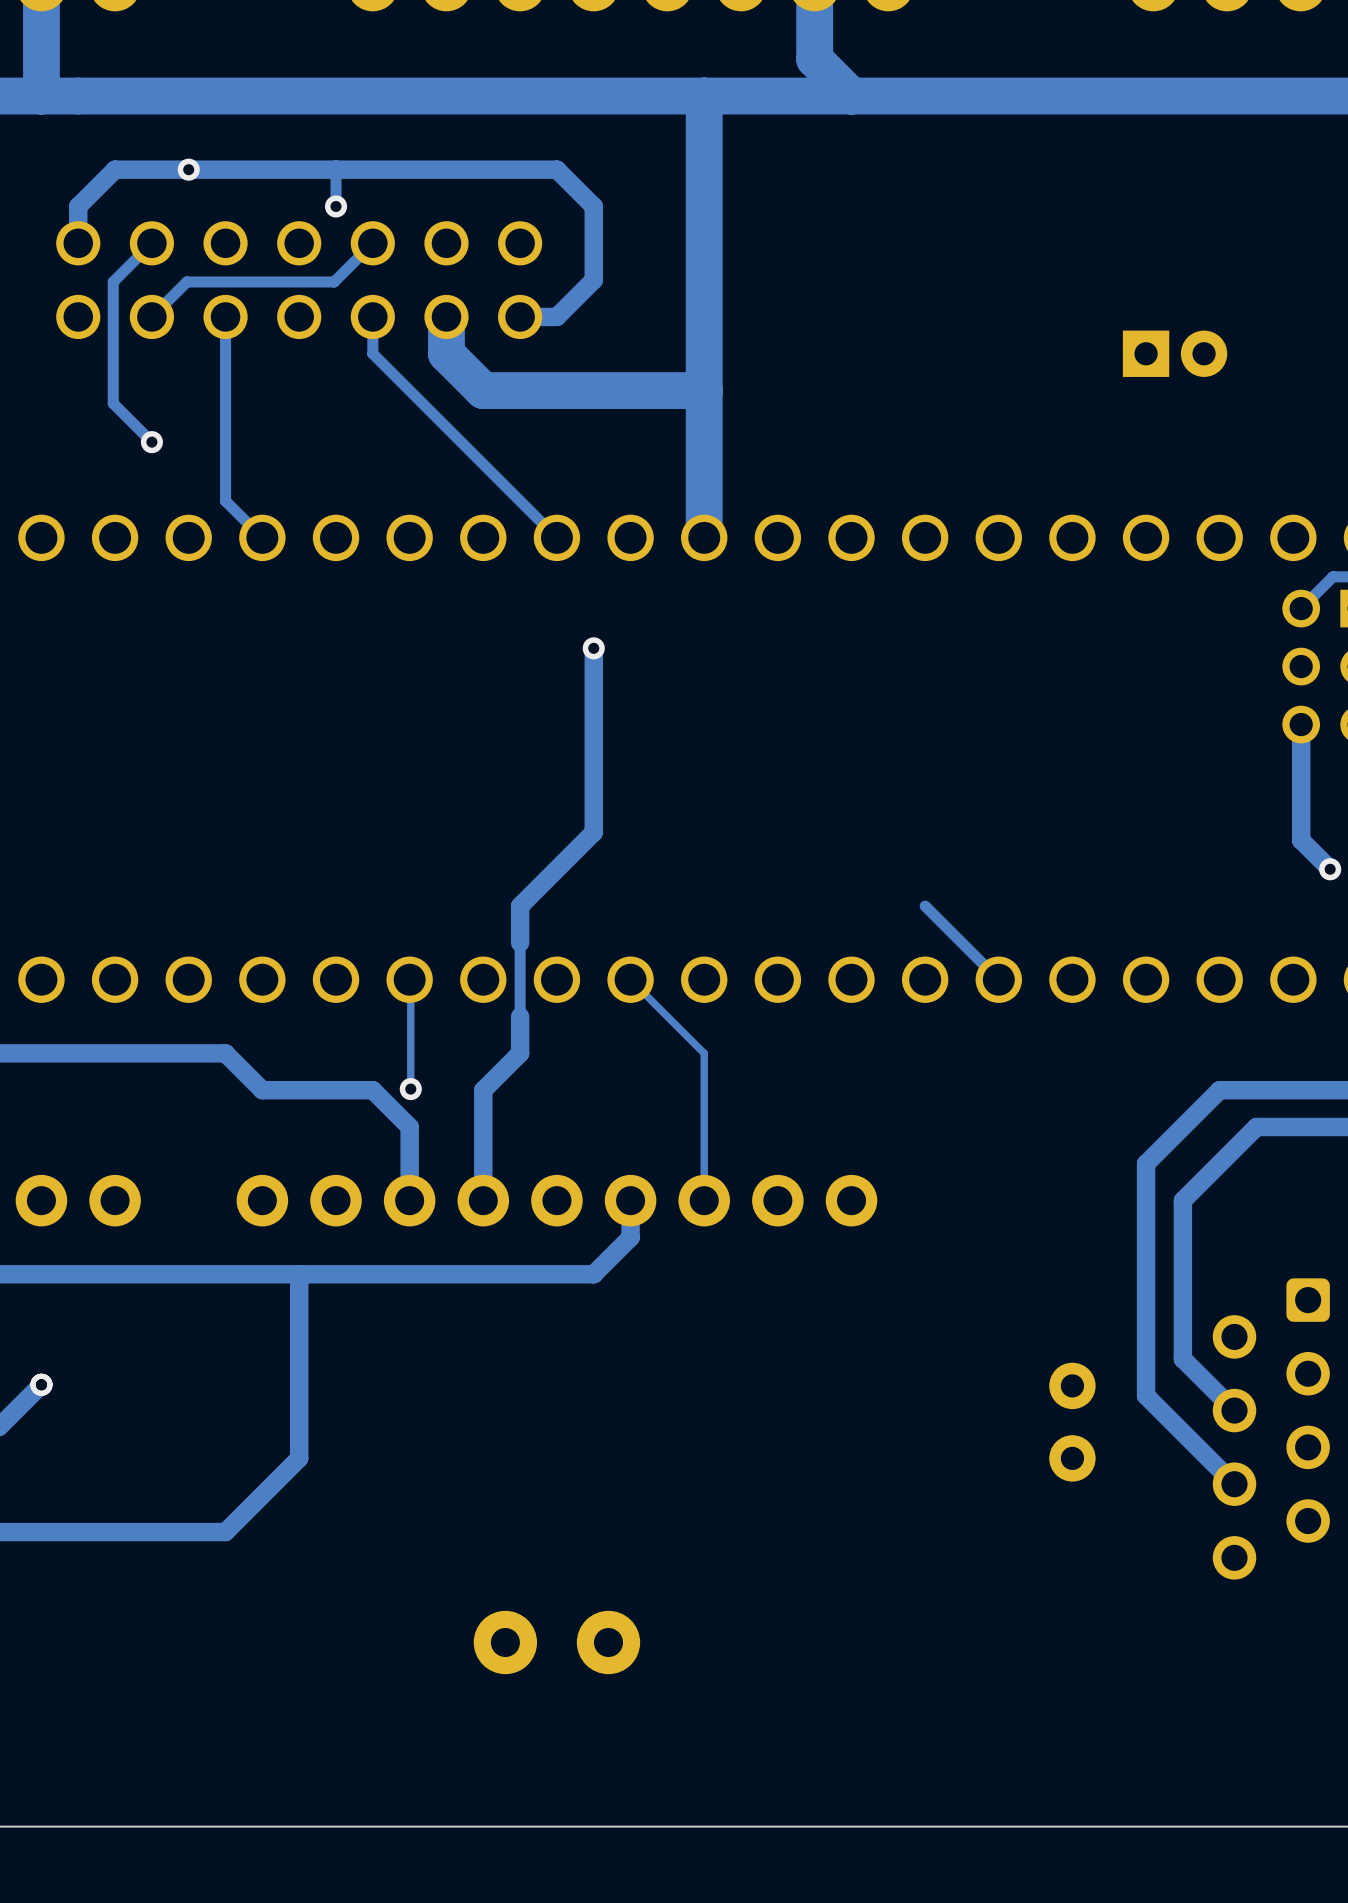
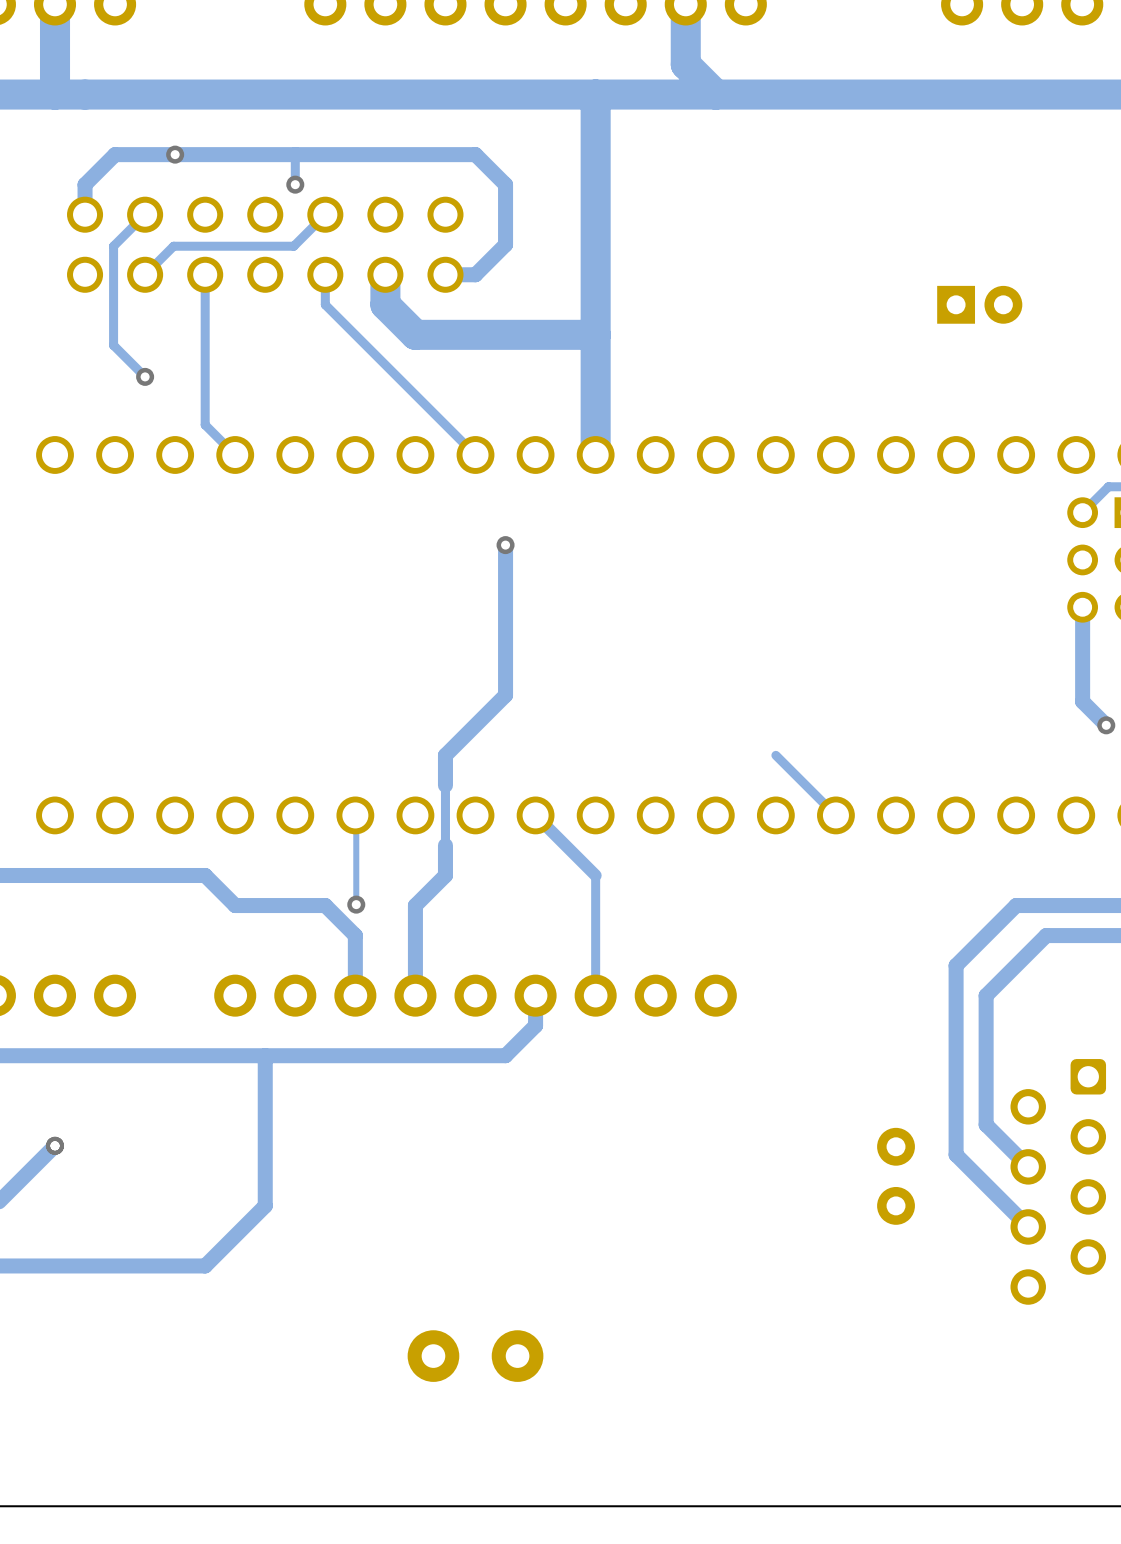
track width: thin (630, 979) (704, 1053) (704, 1200) -> thick (535, 815) (595, 875) (595, 995)

